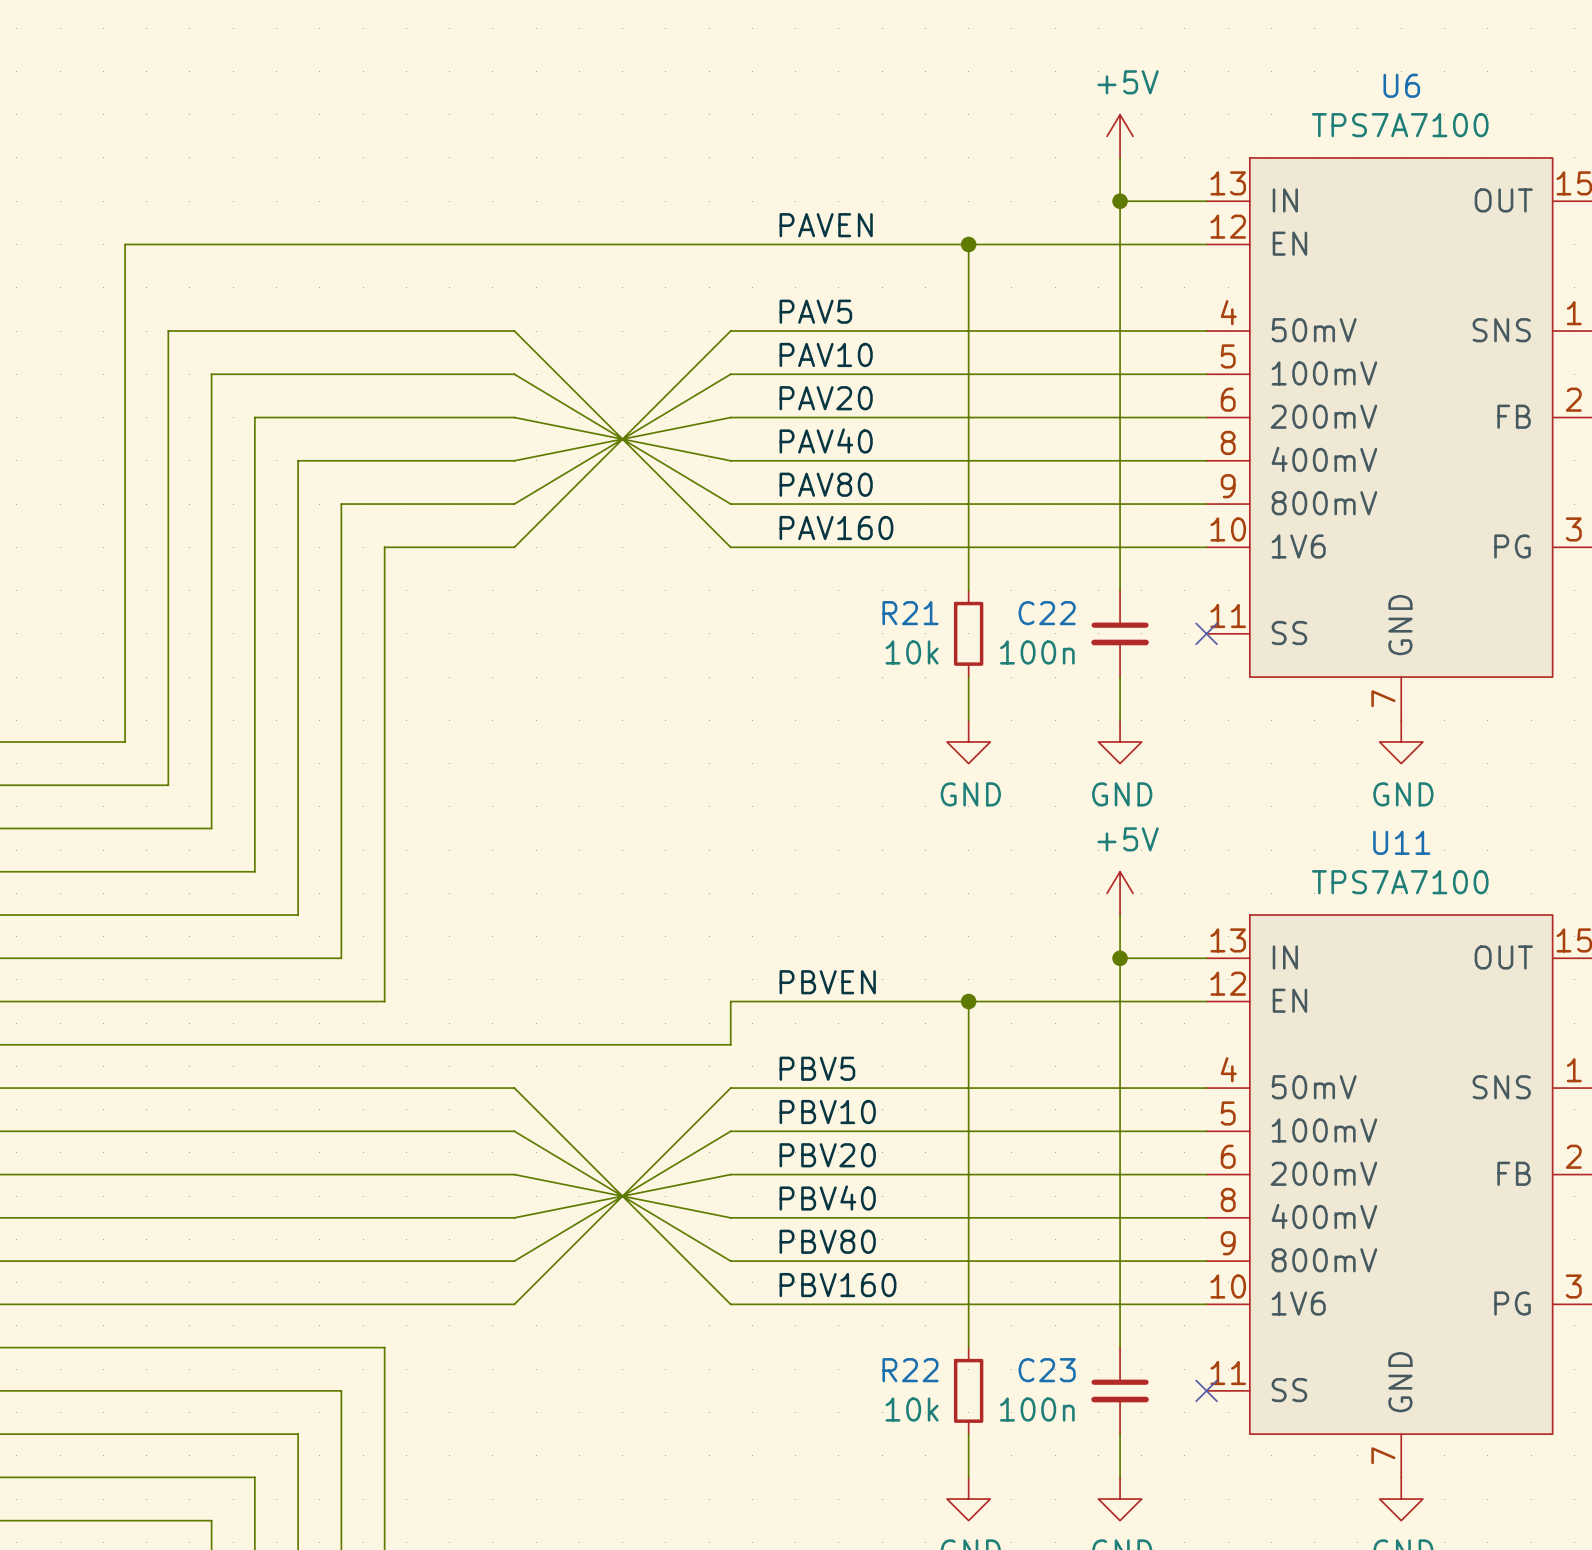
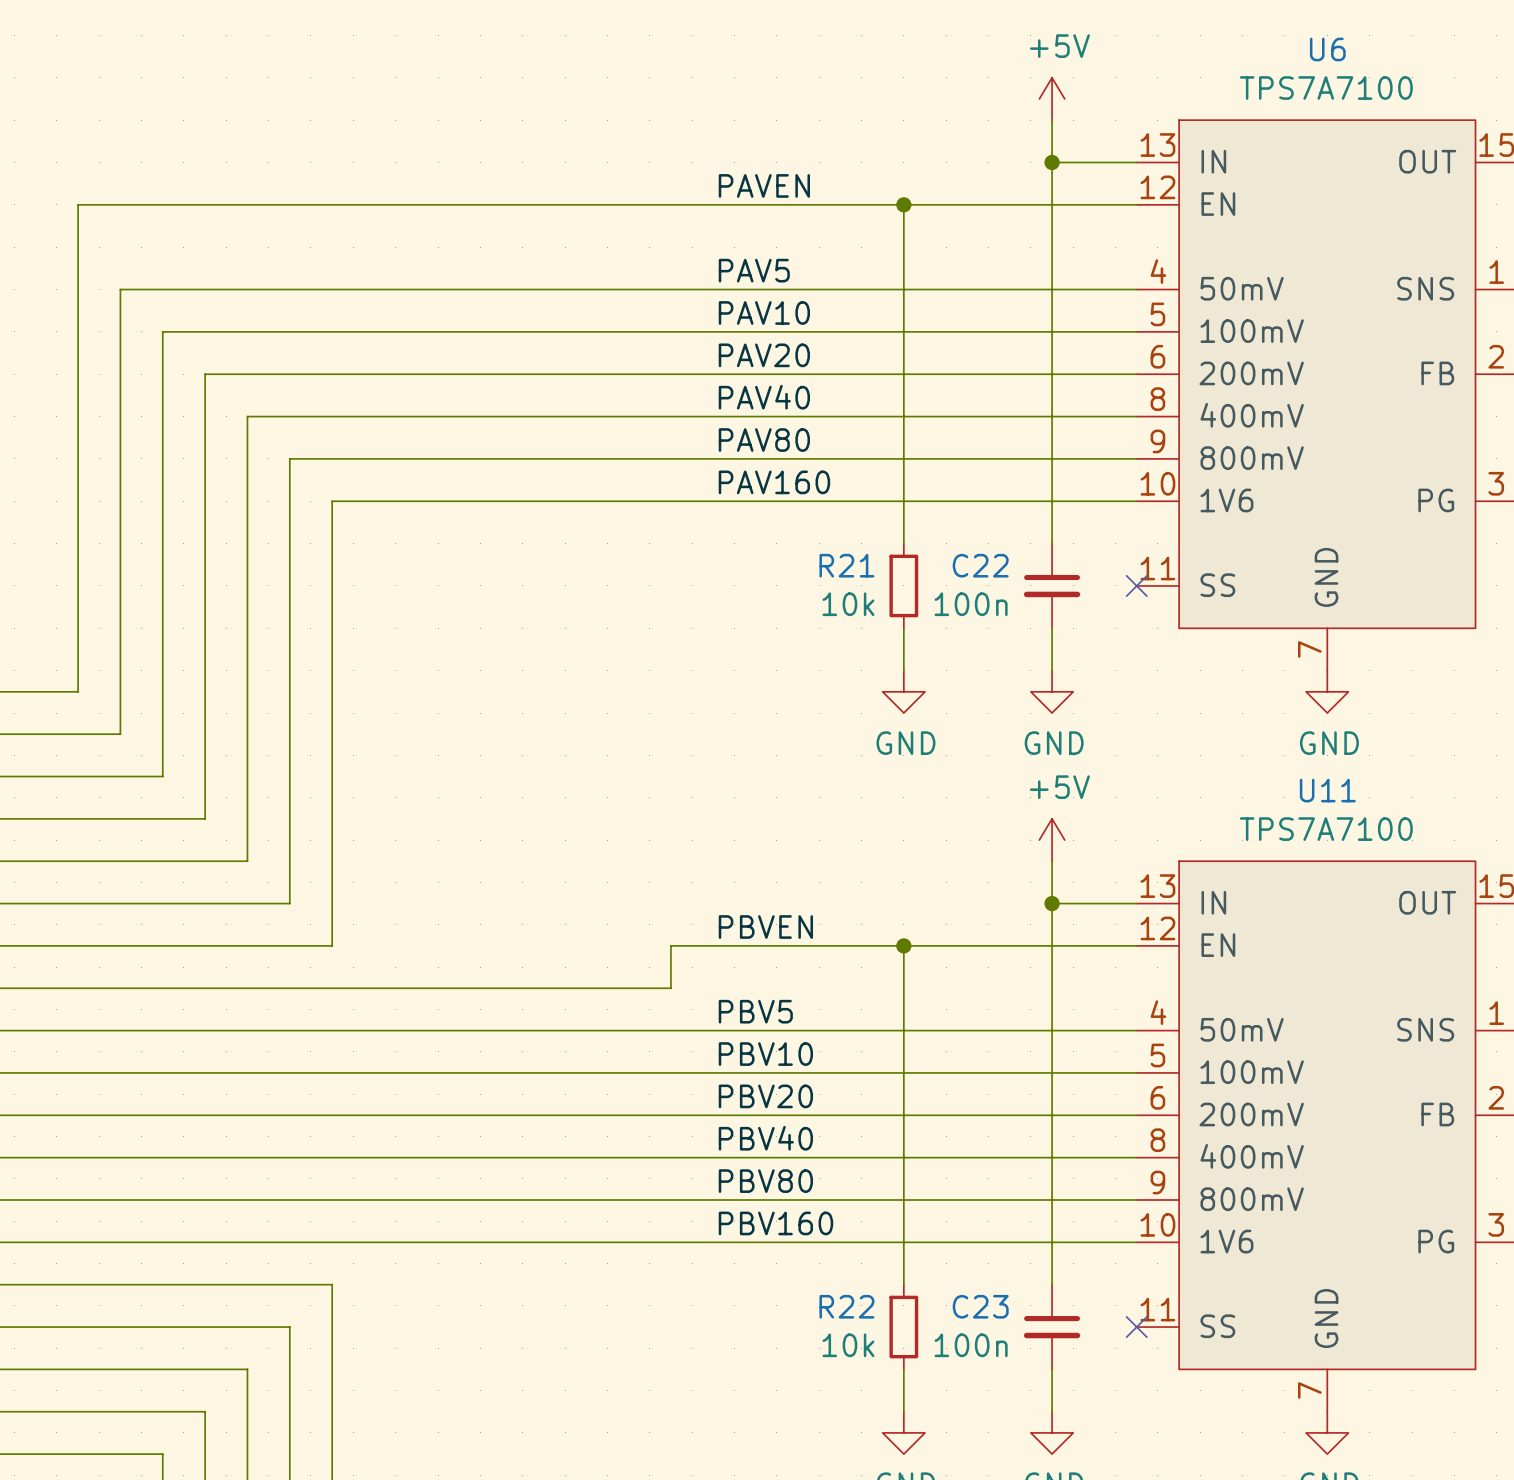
wire: (514, 331) (730, 547) -> (459, 289) (670, 289)
wire: (730, 331) (514, 547) -> (670, 501) (459, 501)
wire: (514, 374) (730, 504) -> (459, 331) (670, 331)
wire: (730, 374) (514, 504) -> (670, 458) (459, 458)
wire: (514, 417) (730, 460) -> (459, 374) (670, 374)
wire: (730, 417) (514, 460) -> (670, 416) (459, 416)
wire: (514, 1088) (730, 1304) -> (459, 1030) (670, 1030)
wire: (730, 1088) (514, 1304) -> (670, 1242) (459, 1242)
wire: (514, 1131) (730, 1261) -> (459, 1072) (670, 1072)
wire: (730, 1131) (514, 1261) -> (670, 1199) (459, 1199)
wire: (514, 1174) (730, 1217) -> (459, 1115) (670, 1115)
wire: (730, 1174) (514, 1217) -> (670, 1157) (459, 1157)

